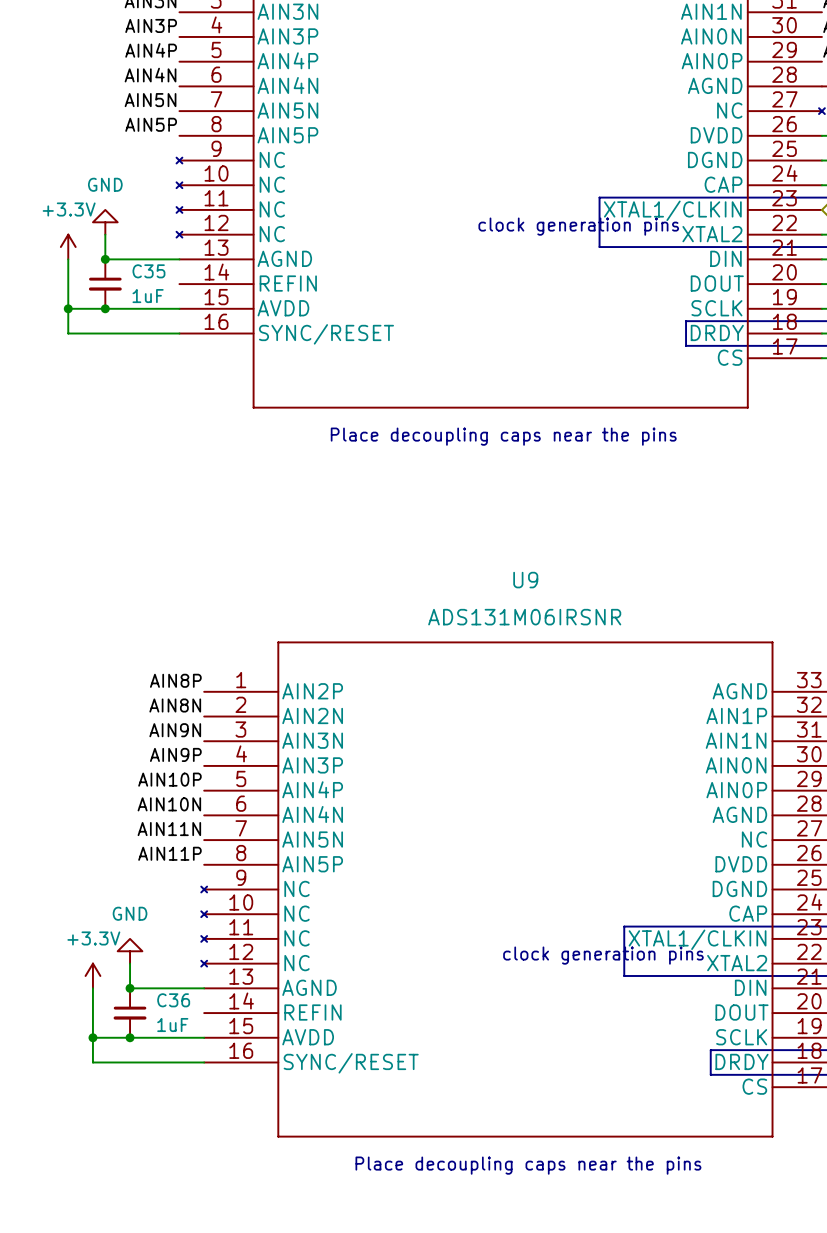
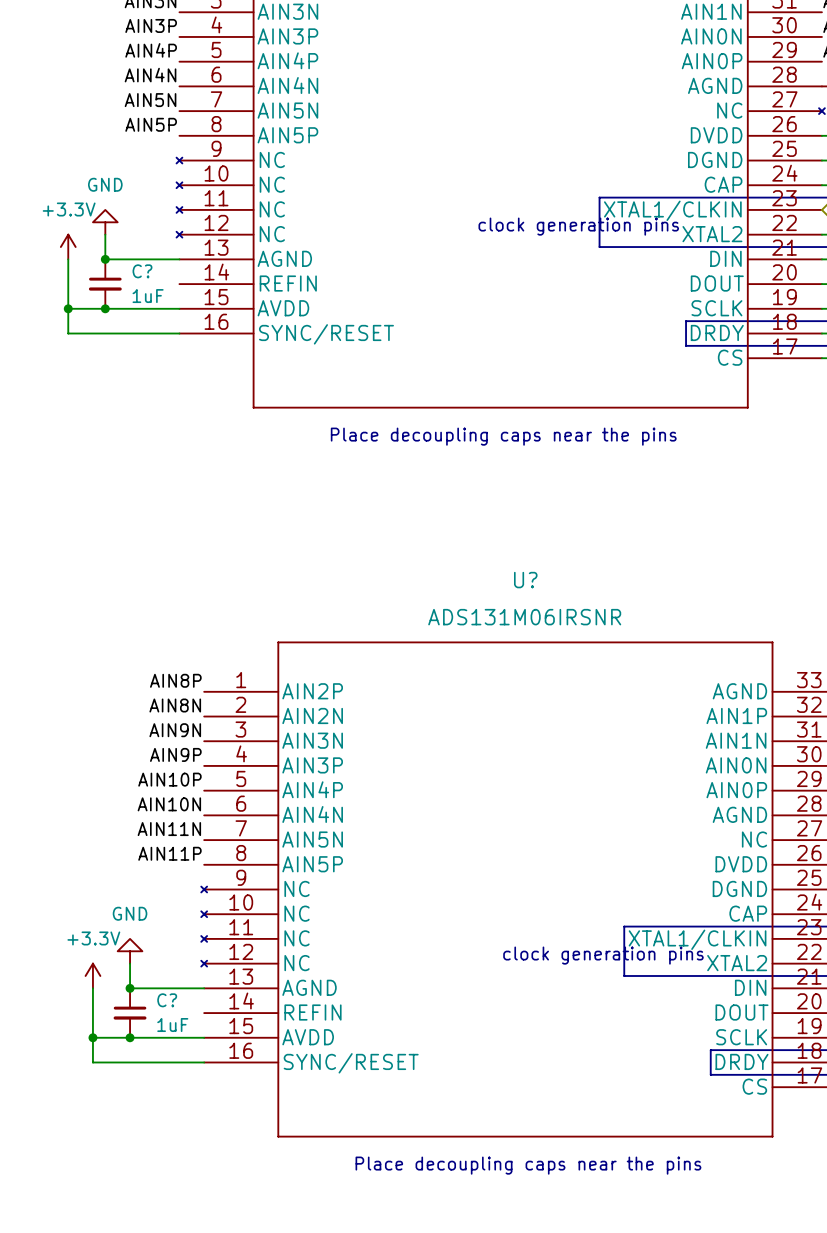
C35 name: C35 (148, 271) -> C? (142, 271)
U9 name: U9 (525, 580) -> U? (525, 580)
C36 name: C36 (173, 1000) -> C? (167, 1000)

